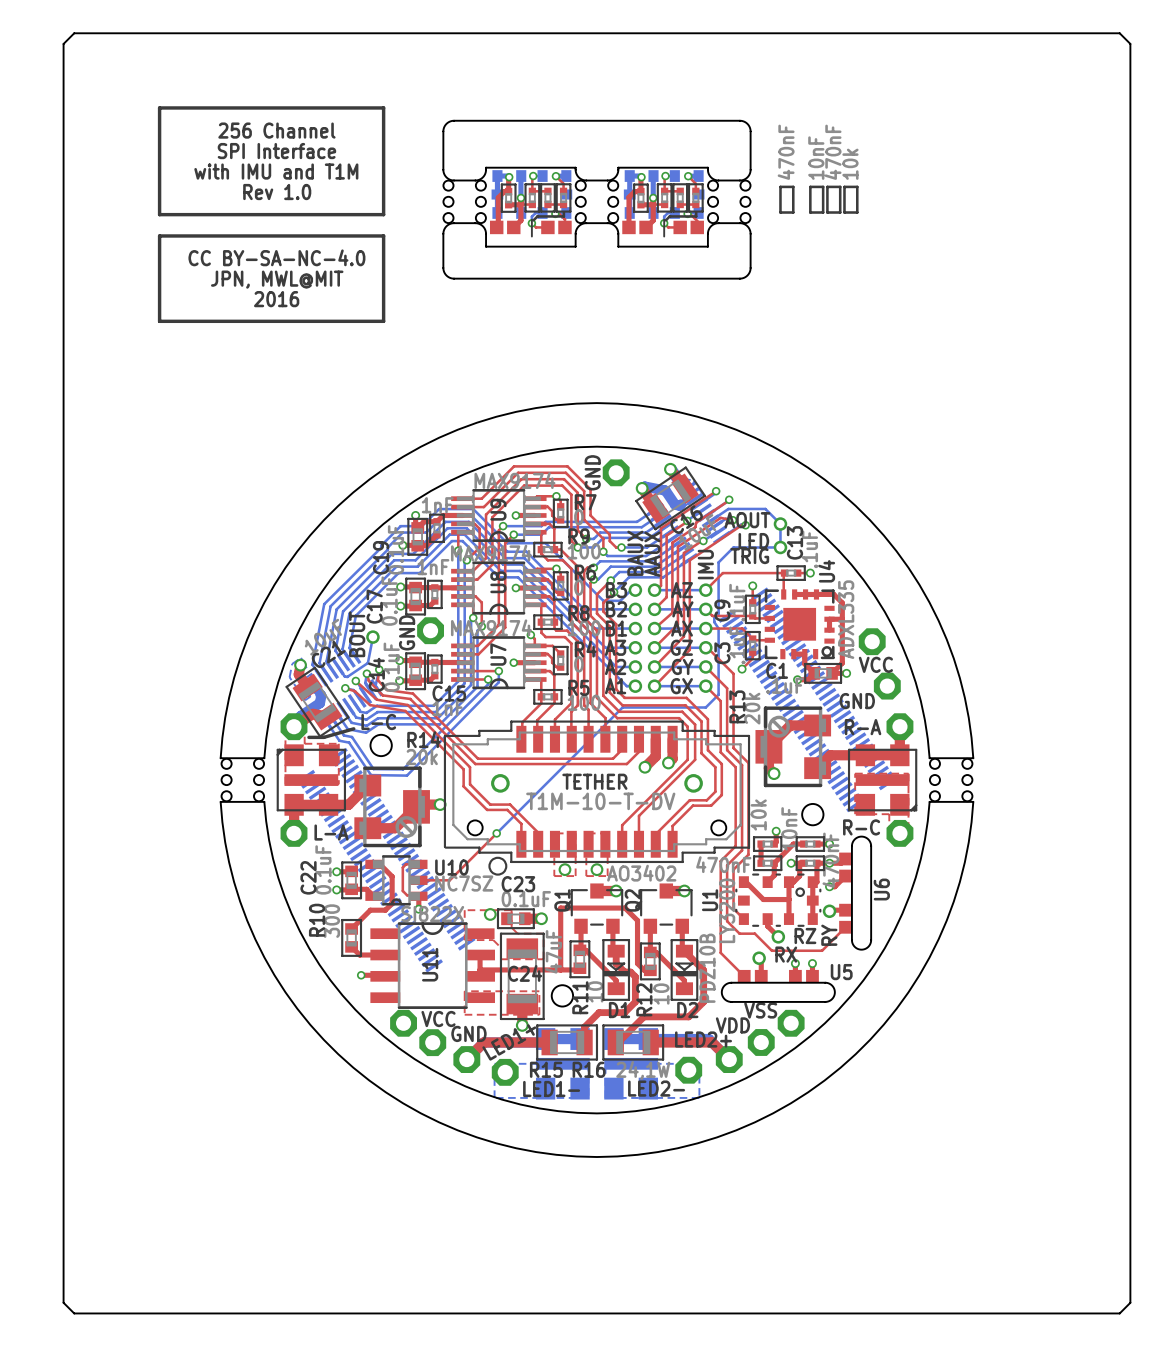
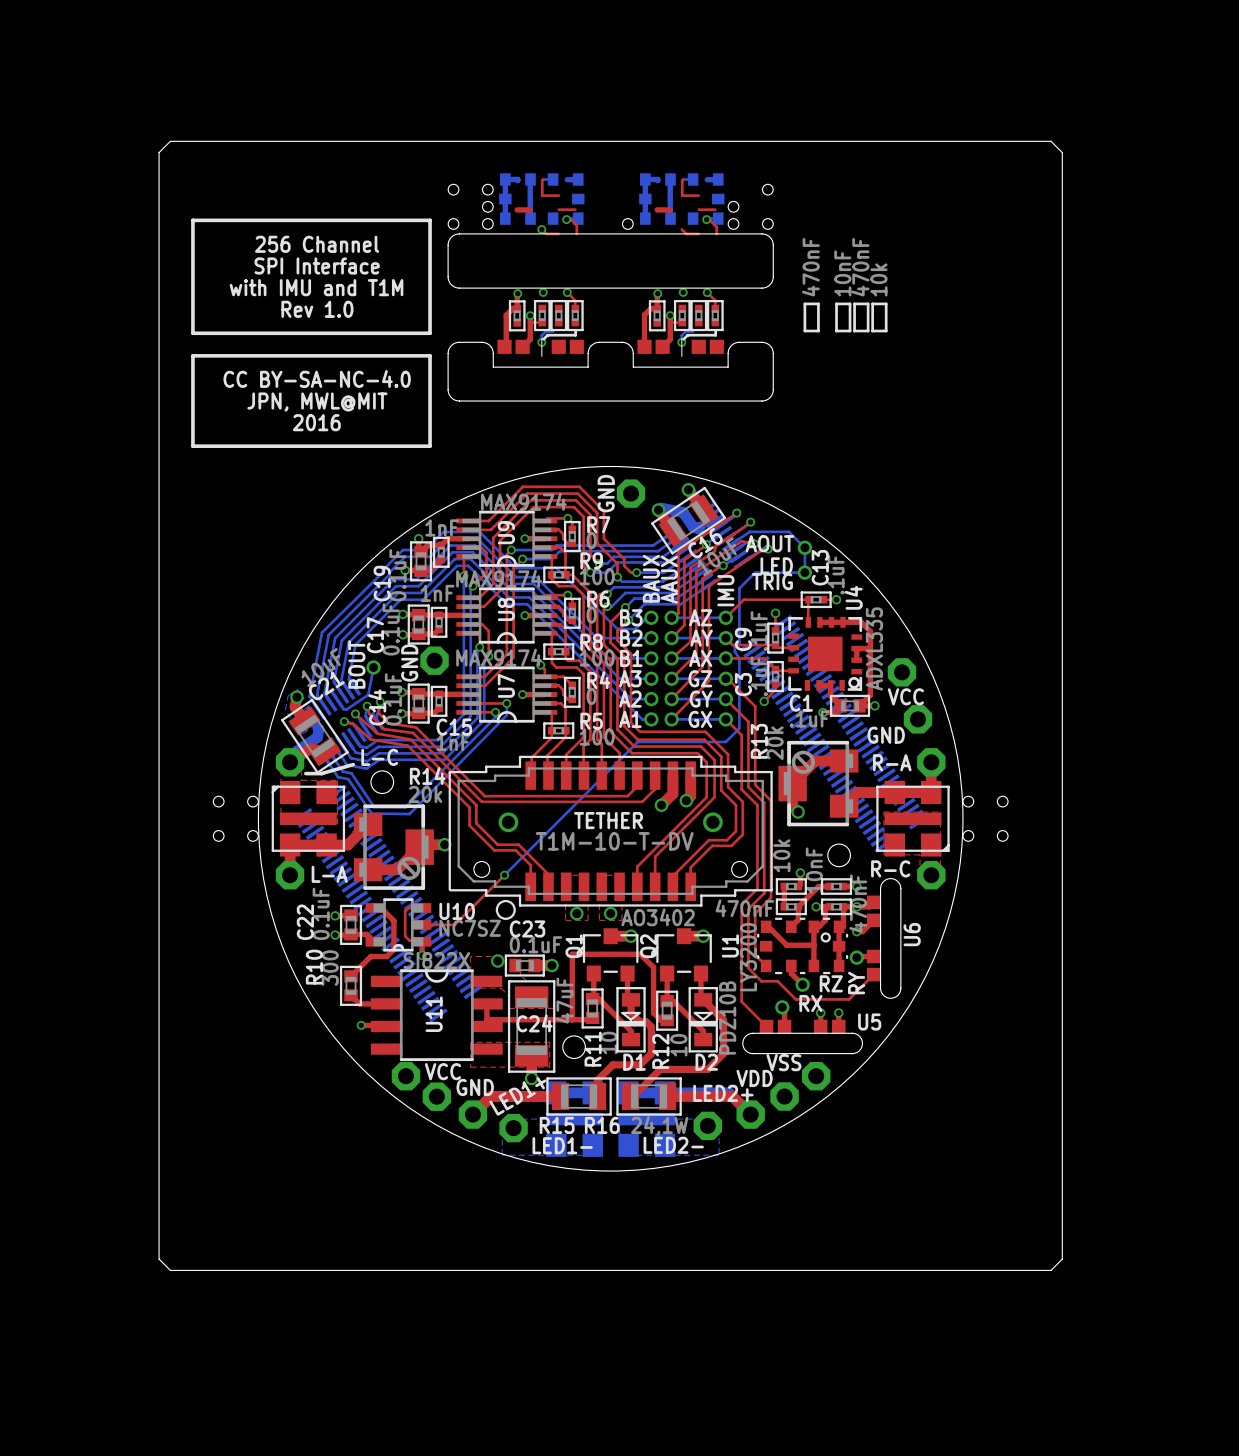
board edge: (74, 33) (63, 43) (63, 1302) (74, 1313) (1119, 1313) (1130, 1302) (1130, 43) (1119, 33) (74, 33) -> (170, 141) (159, 152) (159, 1259) (170, 1270) (1051, 1270) (1062, 1259) (1062, 152) (1051, 141) (170, 141)
board edge: (454, 120) (741, 120) (747, 123) (750, 130) (750, 171) (748, 176) (742, 180) (718, 180) (710, 176) (707, 167) (618, 167) (616, 175) (611, 179) (586, 180) (577, 176) (575, 167) (486, 167) (484, 175) (479, 179) (452, 180) (446, 177) (443, 171) (443, 131) (446, 123) (454, 120) -> none
text position: 256 Channel (276, 130) -> 256 Channel (317, 244)
text position: SPI Interface (276, 151) -> SPI Interface (317, 265)
text position: with IMU and T1M (276, 171) -> with IMU and T1M (316, 287)
via: (533, 176) -> none
top track: (555, 176) (563, 183) (563, 191) -> (567, 292) (575, 300) (575, 308)
via: (555, 176) -> none
via: (665, 176) -> none
top track: (688, 176) (695, 183) (695, 191) -> (707, 292) (715, 300) (715, 308)
via: (688, 176) -> none
top track: (509, 177) (508, 191) (504, 191) (498, 197) (498, 225) (496, 227) -> (517, 293) (517, 308) (512, 308) (506, 315) (506, 345) (504, 346)
via: (509, 177) -> none
top track: (641, 177) (640, 191) (634, 191) (628, 197) (628, 227) -> (657, 293) (657, 308) (650, 308) (644, 314) (644, 346)
via: (641, 177) -> none
hole: (580, 185) -> none
hole: (613, 185) -> none
hole: (713, 185) -> none
line: (780, 186) (780, 212) (793, 212) (793, 186) (780, 186) -> (804, 303) (804, 331) (818, 331) (818, 303) (804, 303)
line: (810, 186) (823, 186) (823, 212) (810, 212) (810, 186) -> (836, 303) (850, 303) (850, 331) (836, 331) (836, 303)
line: (827, 186) (840, 186) (840, 212) (827, 212) (827, 186) -> (854, 303) (868, 303) (868, 331) (854, 331) (854, 303)
line: (844, 186) (857, 186) (857, 212) (844, 212) (844, 186) -> (872, 303) (886, 303) (886, 331) (872, 331) (872, 303)
text position: Rev 1.0 (277, 192) -> Rev 1.0 (317, 309)
via: (520, 197) -> none
part: (532, 197) -> none
part: (547, 197) -> none
part: (563, 197) -> none
via: (653, 197) -> none
part position: (664, 197) -> (682, 315)
part: 470nF (680, 197) -> none
part position: (695, 197) -> (715, 315)
part: (508, 198) -> none
part: 470nF (640, 198) -> none
hole: (448, 201) -> none
hole: (580, 201) -> none
hole: (613, 201) -> none
hole: (745, 201) -> none
top track: (532, 204) (520, 204) (520, 197) (520, 220) (513, 227) -> (542, 322) (530, 322) (530, 315) (530, 339) (522, 346)
top track: (664, 204) (653, 204) (653, 197) (653, 220) (646, 227) -> (682, 322) (670, 322) (670, 315) (670, 339) (662, 346)
bottom track: (542, 212) (535, 212) (531, 216) (531, 223) -> (553, 331) (545, 331) (541, 335) (541, 342)
line: (563, 212) (563, 216) (538, 216) -> (575, 330) (575, 335) (548, 335)
bottom track: (674, 212) (667, 212) (664, 216) (664, 223) -> (693, 331) (685, 331) (681, 335) (681, 342)
line: (696, 212) (696, 216) (670, 216) -> (715, 330) (715, 335) (688, 335)
line: (202, 214) (159, 214) (159, 107) (383, 107) (383, 214) -> (192, 220) (192, 333)
line: (537, 216) (533, 220) -> (548, 335) (543, 339)
line: (670, 216) (665, 220) -> (688, 335) (683, 339)
hole: (580, 218) -> none
line: (531, 219) (531, 236) -> (541, 338) (541, 356)
line: (664, 219) (664, 236) -> (681, 338) (681, 356)
via: (664, 223) -> none
part: (496, 227) -> none
part: (513, 227) -> none
part: (547, 227) -> none
part: (564, 227) -> none
part: (628, 227) -> none
part: (646, 227) -> none
part: (680, 227) -> none
part: (697, 227) -> none
board edge: (443, 238) (445, 227) (454, 223) (476, 223) (481, 225) (485, 232) (486, 246) (575, 246) (576, 229) (579, 225) (586, 223) (609, 223) (614, 225) (618, 232) (618, 246) (707, 246) (708, 229) (712, 225) (718, 223) (744, 223) (749, 229) (750, 238) -> (448, 245) (451, 237) (459, 233) (761, 233) (769, 237) (773, 245)
text position: CC BY-SA-NC-4.0 (276, 257) -> CC BY-SA-NC-4.0 (317, 378)
text position: JPN, MWL@MIT (277, 279) -> JPN, MWL@MIT (317, 402)
via: none -> (543, 292)
via: none -> (567, 292)
via: none -> (683, 292)
via: none -> (707, 292)
via: none -> (517, 293)
via: none -> (657, 293)
text position: 2016 (276, 299) -> 2016 (316, 422)
part: none -> (517, 315)
via: none -> (530, 315)
part: none -> (542, 315)
part: none -> (558, 315)
part: none -> (575, 315)
part: none -> 470nF (657, 315)
via: none -> (670, 315)
part: none -> 470nF (698, 315)
line: (202, 321) (159, 321) (159, 235) (383, 235) (383, 321) -> (384, 220) (430, 220) (430, 333) (384, 333)
board edge: none -> (459, 342) (483, 342) (488, 344) (493, 352) (493, 367) (588, 367) (588, 349) (592, 344) (599, 342) (623, 342) (628, 344) (633, 352) (633, 367) (728, 367) (728, 352) (732, 344) (737, 342) (763, 342) (768, 344) (772, 350) (773, 391) (768, 398) (761, 401) (457, 400) (452, 398) (448, 392) (448, 353) (451, 345) (459, 342)
via: none -> (541, 342)
via: none -> (681, 342)
part: none -> (504, 346)
part: none -> (522, 346)
part: none -> (558, 346)
part: none -> (576, 346)
part: none -> (644, 346)
part: none -> (662, 346)
part: none -> (698, 346)
part: none -> (716, 346)
line: none -> (192, 355) (192, 446) (430, 446) (430, 355) (192, 355)
round board edge: none -> [258, 466, 964, 1172]
board edge: (220, 758) (264, 758) (273, 701) (284, 664) (299, 628) (319, 595) (342, 564) (383, 523) (431, 490) (483, 466) (539, 451) (596, 446) (654, 451) (710, 466) (762, 490) (810, 523) (851, 564) (874, 595) (894, 628) (909, 664) (920, 701) (929, 758) (973, 758) (964, 697) (953, 658) (938, 620) (908, 567) (883, 535) (855, 505) (824, 479) (790, 456) (736, 429) (697, 416) (657, 408) (596, 403) (536, 408) (496, 416) (457, 429) (403, 456) (369, 479) (338, 505) (310, 535) (285, 567) (255, 620) (240, 658) (229, 697) (220, 758) -> none
hole: (226, 780) -> none
hole: (259, 780) -> none
hole: (934, 780) -> none
hole: (967, 780) -> none
board edge: (220, 801) (264, 801) (273, 859) (284, 895) (299, 931) (319, 964) (342, 995) (383, 1036) (431, 1069) (483, 1093) (539, 1108) (596, 1113) (654, 1108) (710, 1093) (762, 1069) (810, 1036) (851, 995) (874, 964) (894, 931) (909, 895) (920, 859) (929, 801) (973, 801) (964, 862) (953, 901) (938, 939) (908, 992) (883, 1024) (855, 1054) (824, 1080) (790, 1103) (736, 1130) (697, 1143) (657, 1152) (596, 1157) (536, 1152) (496, 1143) (457, 1130) (403, 1103) (369, 1080) (338, 1054) (310, 1024) (285, 992) (255, 939) (240, 901) (229, 862) (220, 801) -> none

